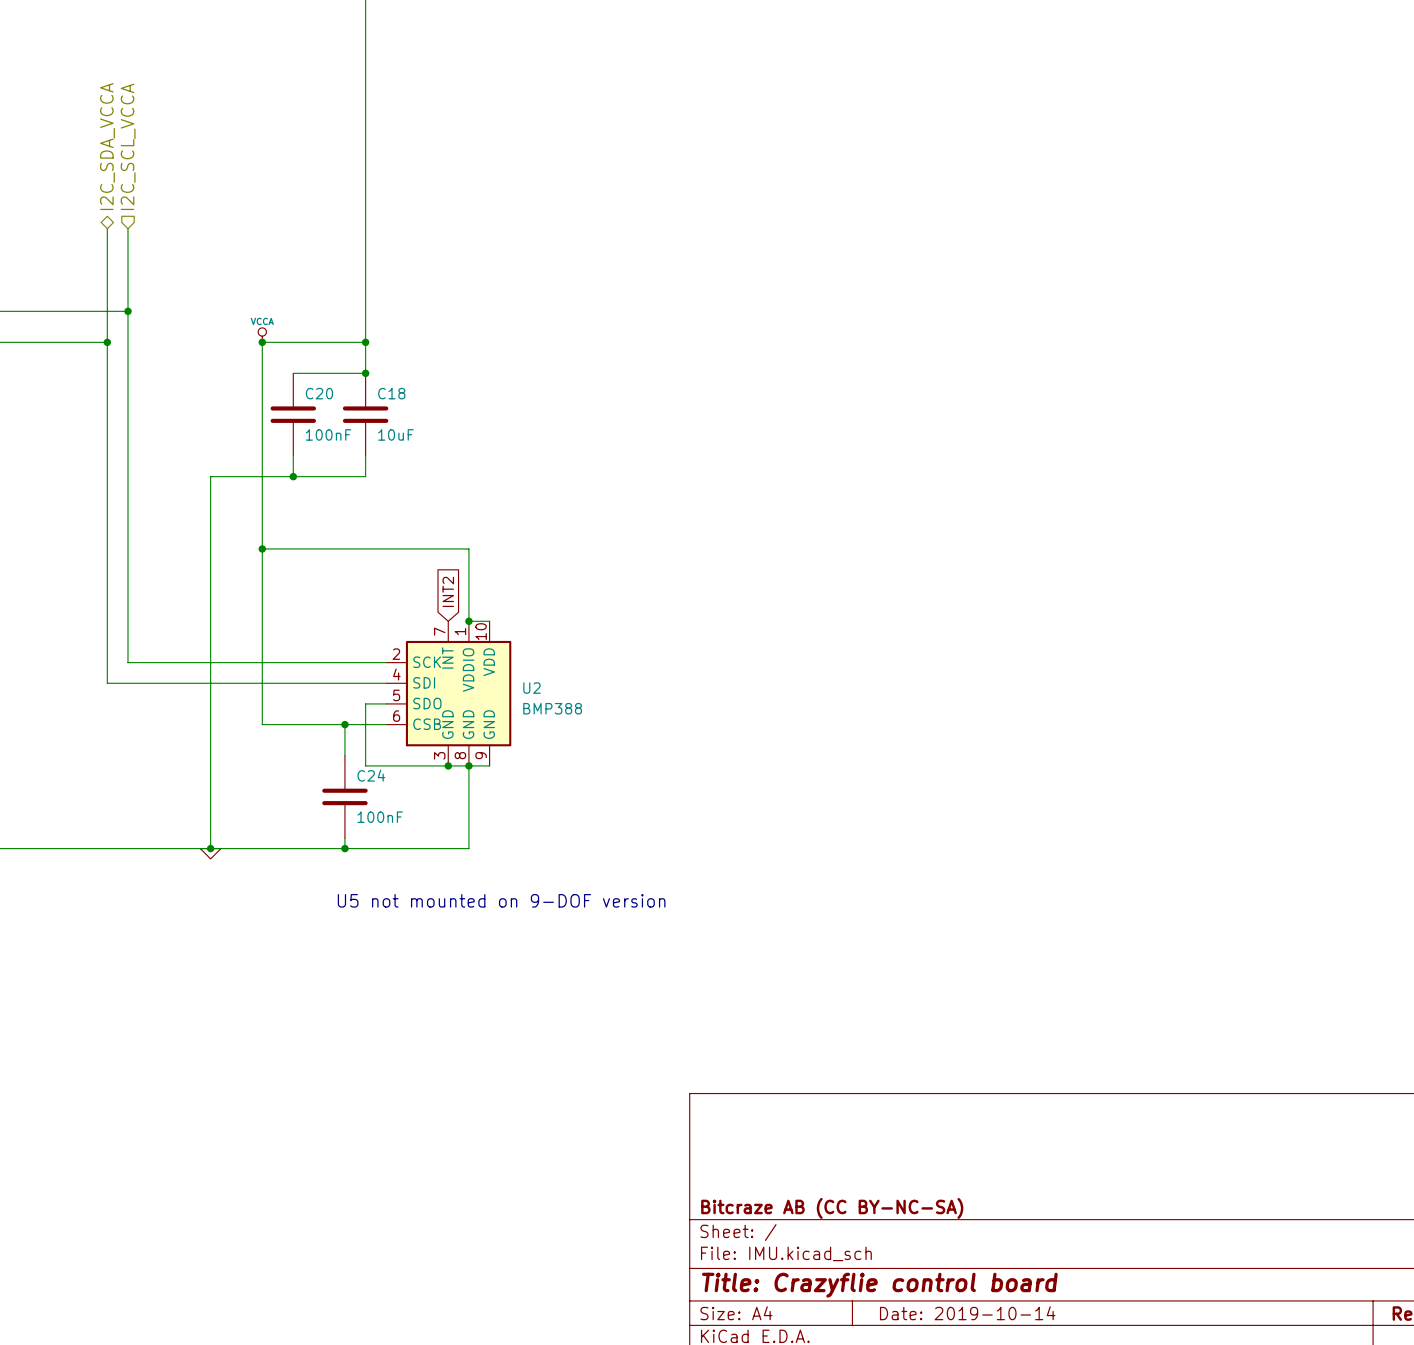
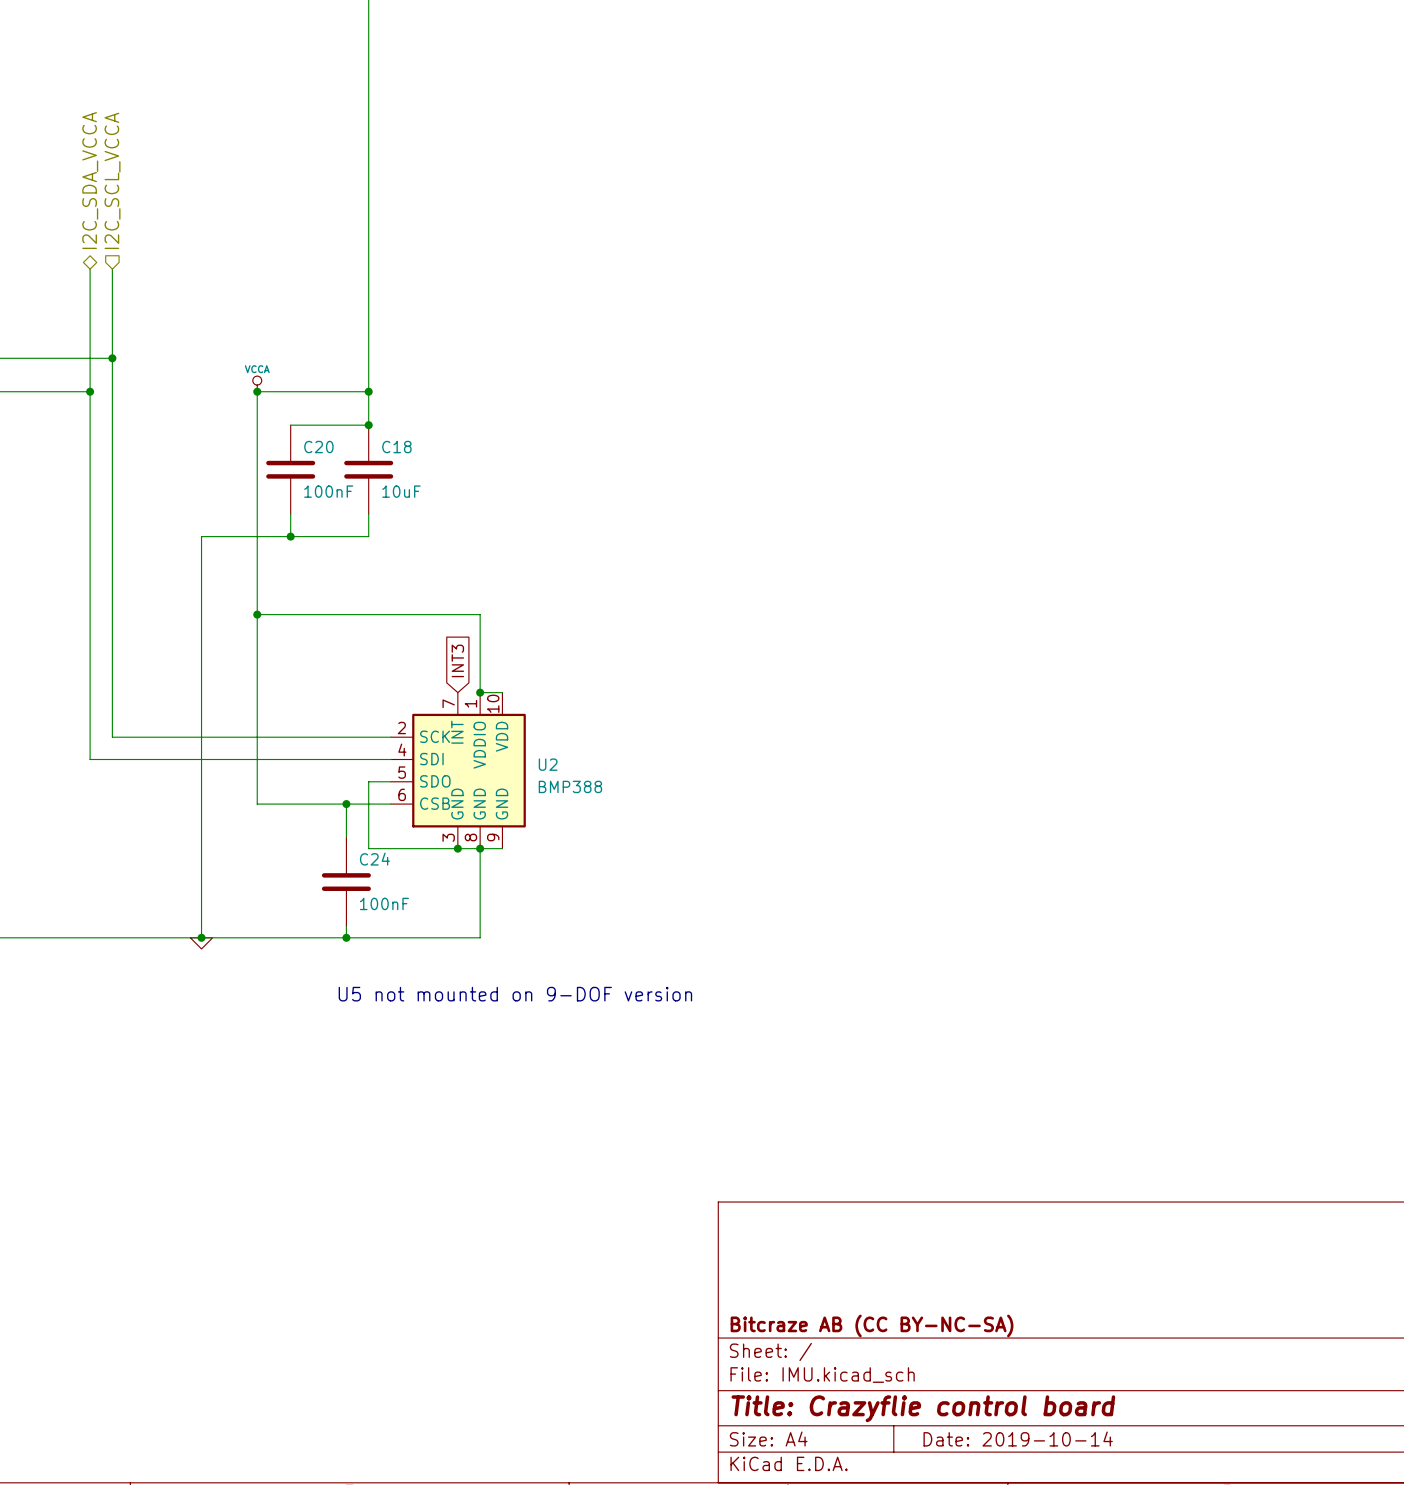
global label: INT2 (448, 591) -> INT3 (457, 660)

